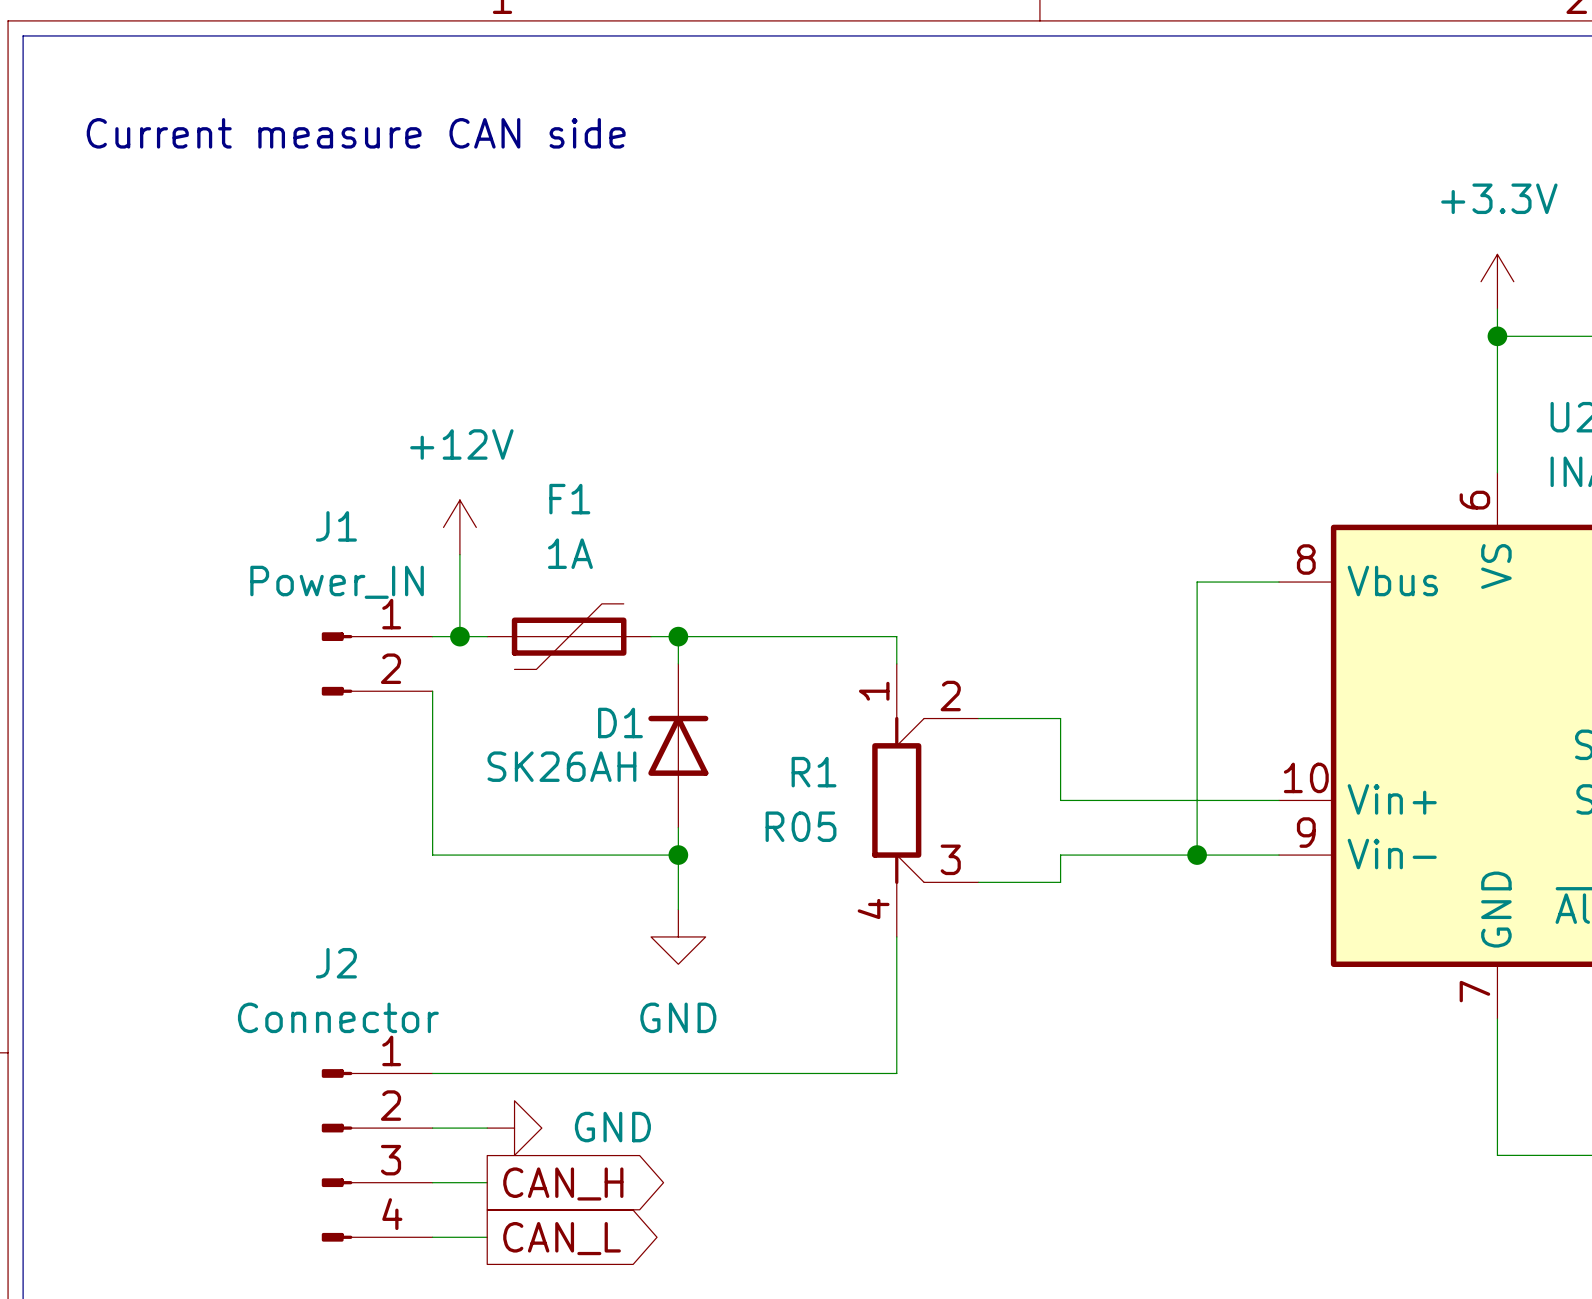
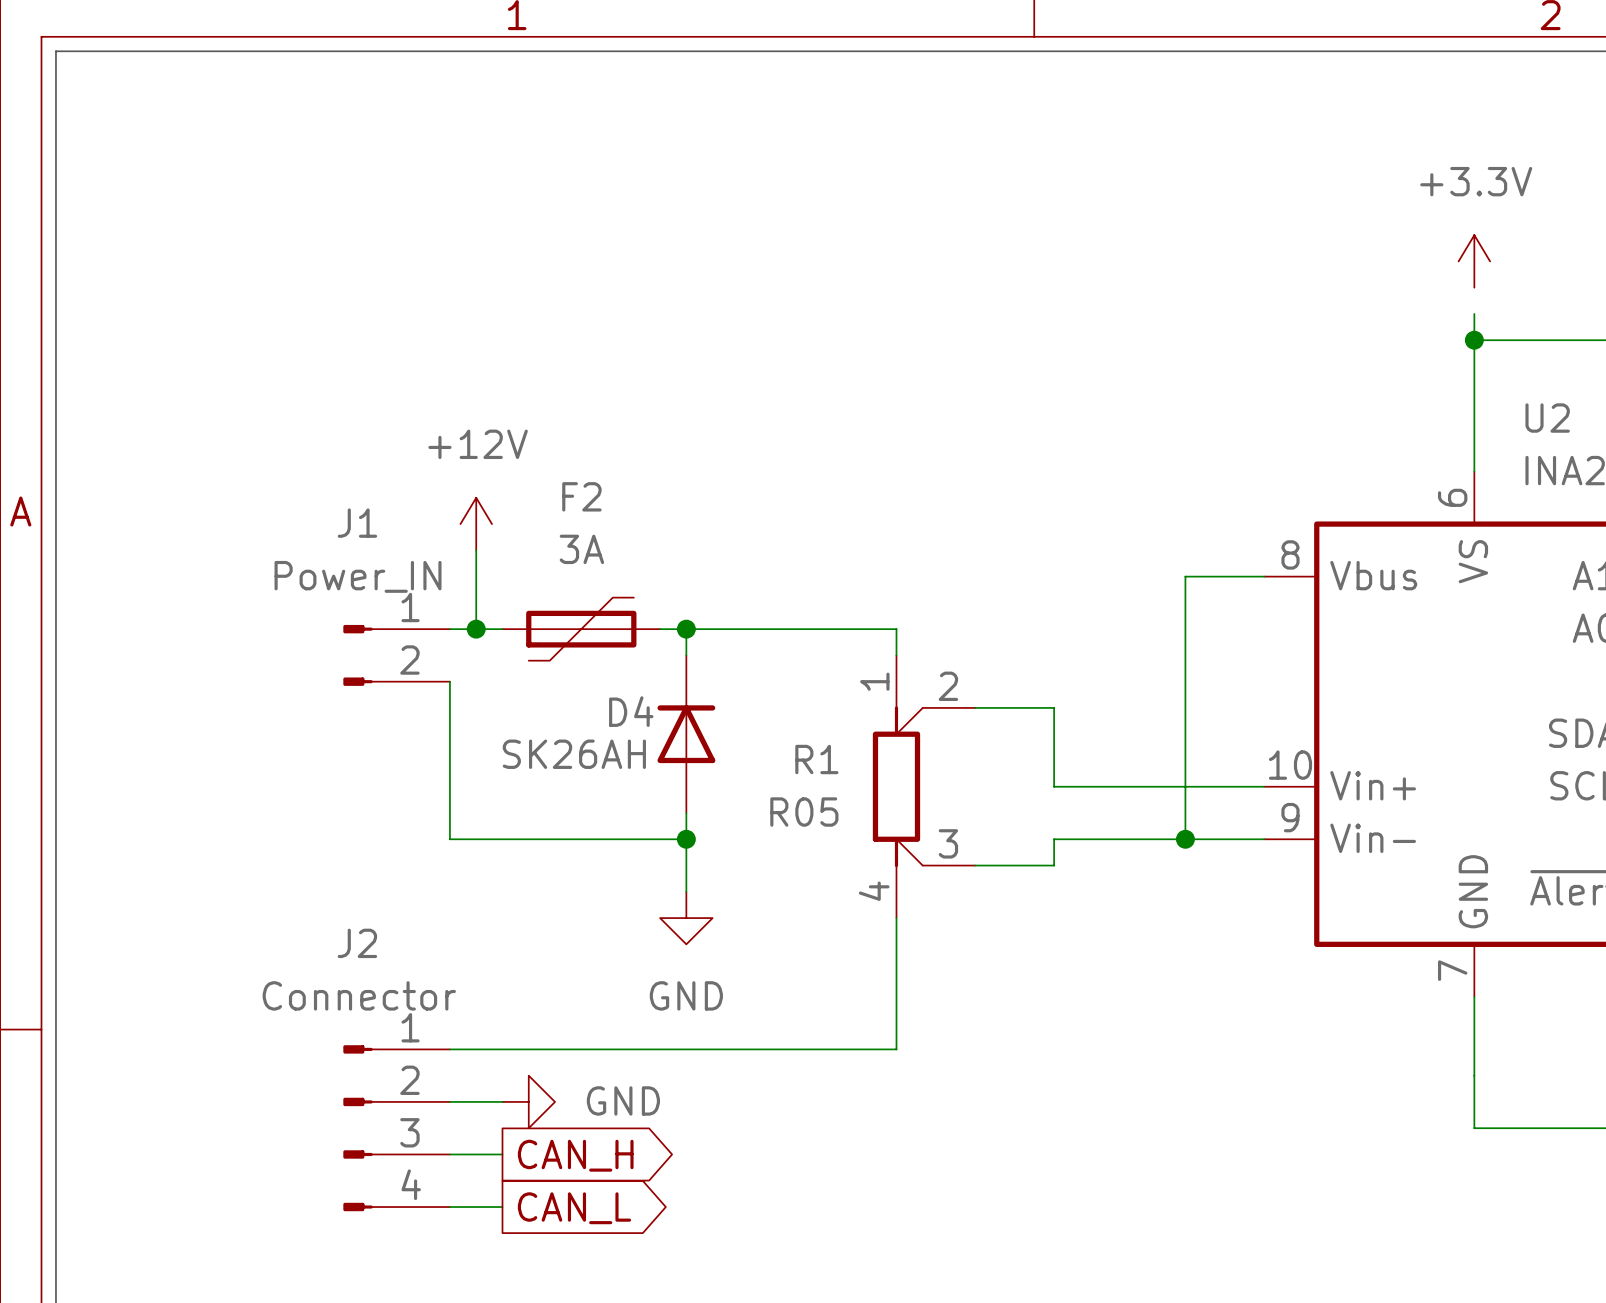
text: Current measure CAN side (356, 133) -> none
power symbol position: +3.3V (1497, 281) -> +3.3V (1474, 261)
F1 name: F1 (569, 499) -> F2 (581, 496)
F1 value: 1A (570, 553) -> 3A (581, 549)
D1 name: D1 (620, 722) -> D4 (631, 711)

